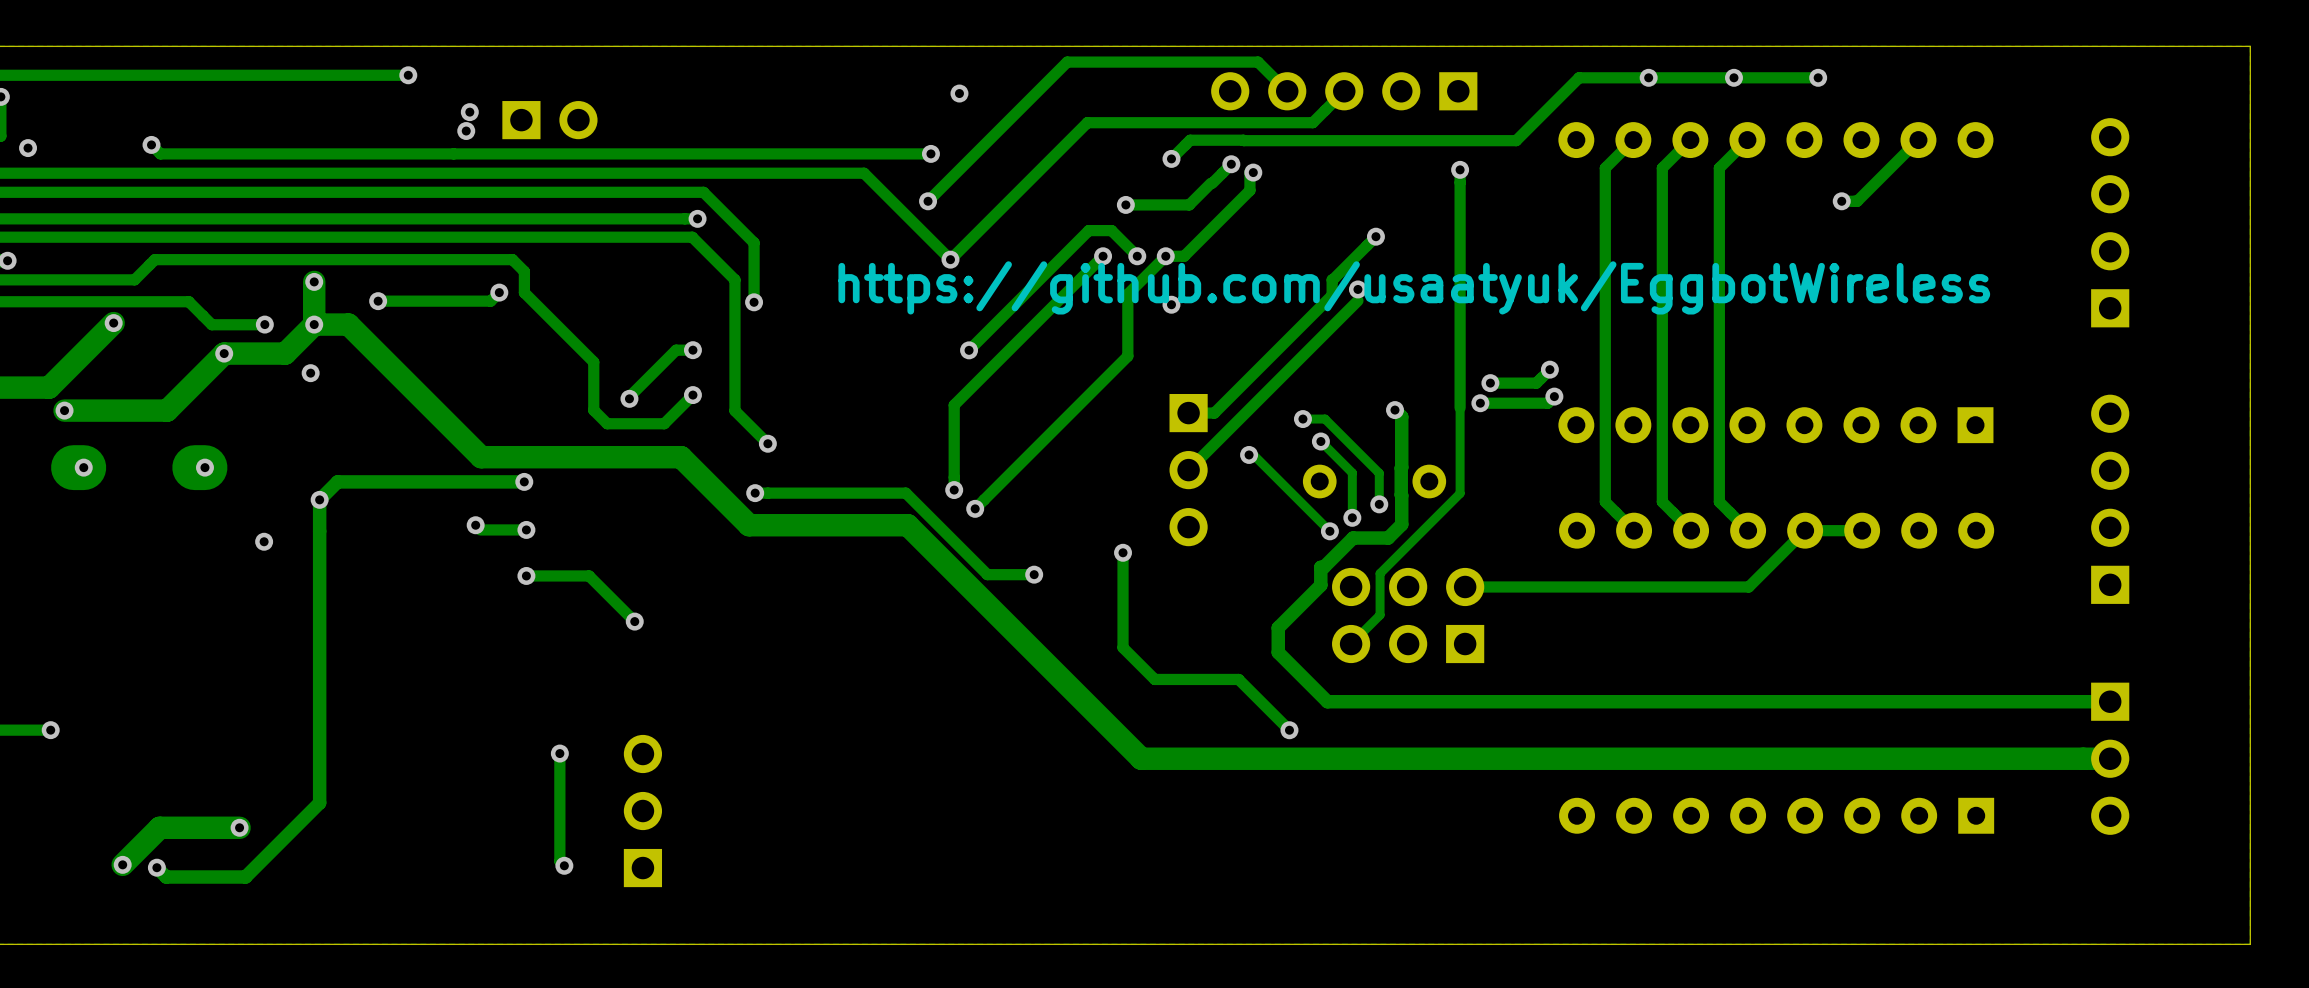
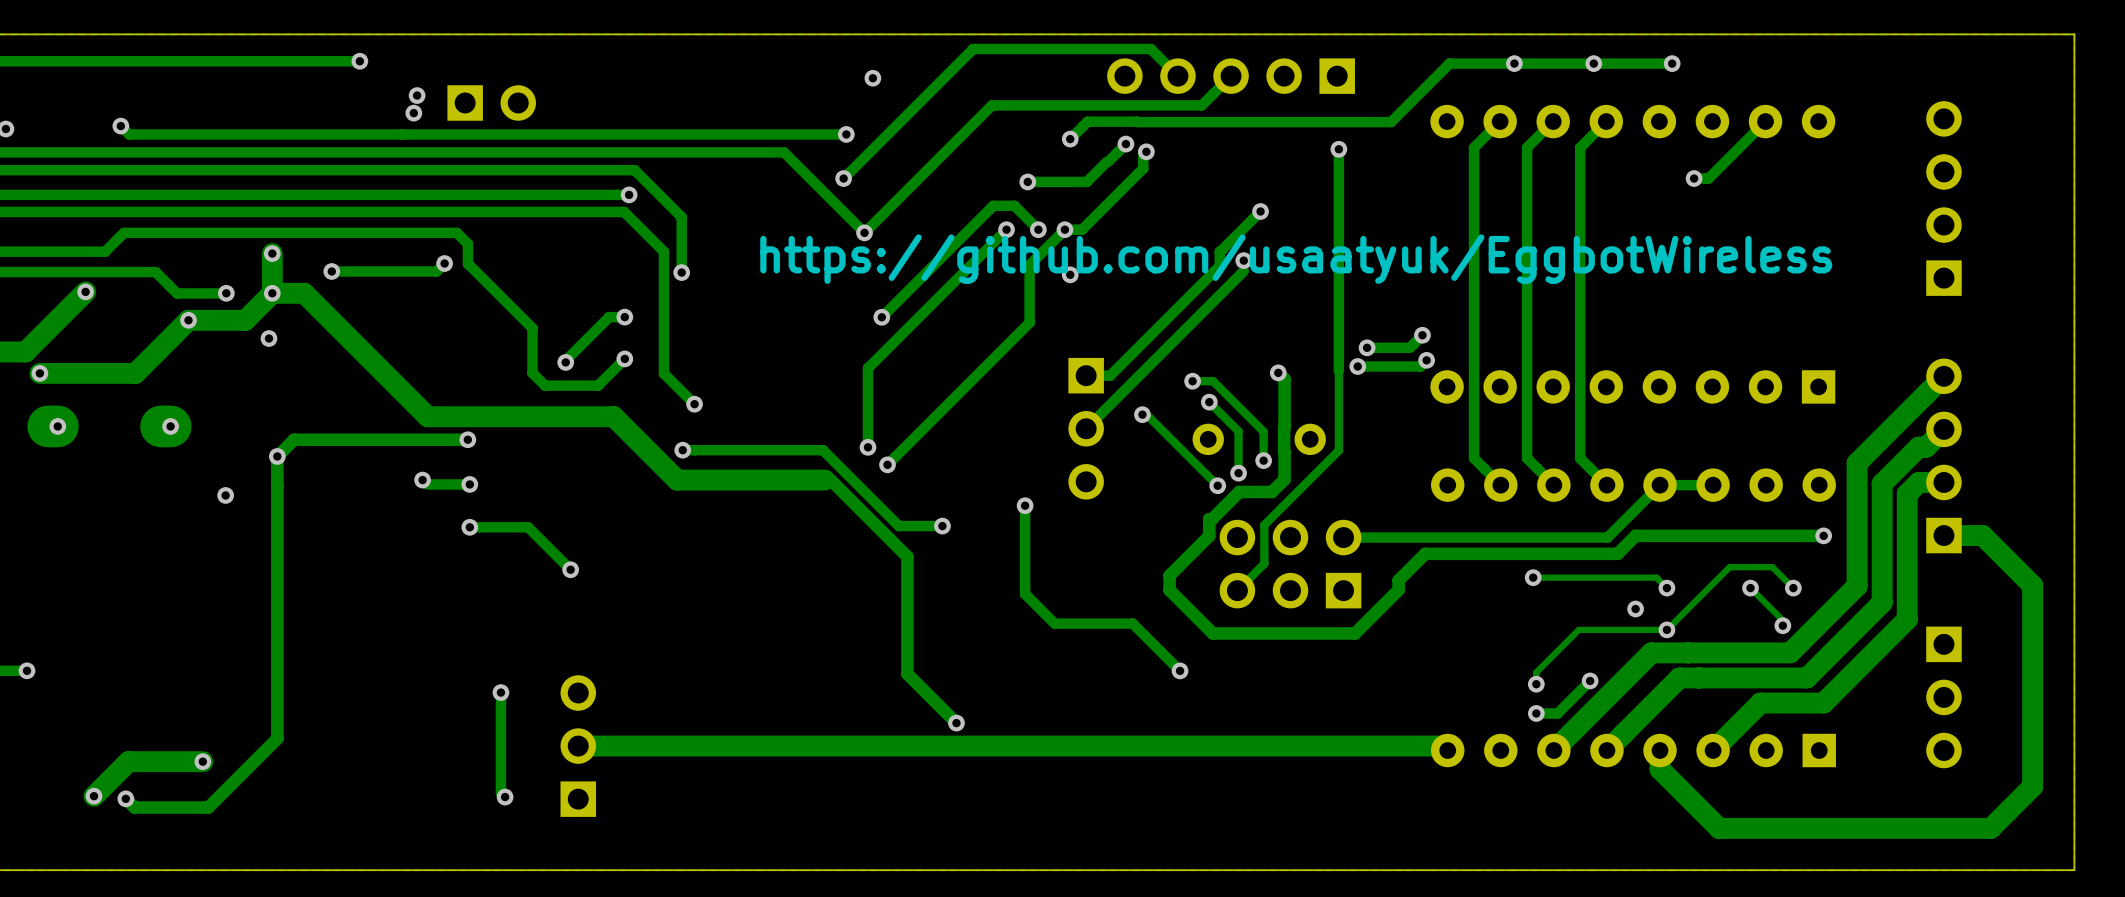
track: none -> (1943, 376) (1857, 463) (1857, 586) (1790, 652) (1651, 652) (1553, 750)
track: none -> (1943, 429) (1926, 447) (1918, 447) (1882, 483) (1882, 602) (1806, 677) (1679, 677) (1606, 750)
track: (907, 525) (1141, 758) (2110, 758) -> (824, 480) (830, 480) (907, 556) (907, 674) (956, 723)
track: none -> (1943, 482) (1918, 482) (1907, 494) (1907, 619) (1823, 703) (1760, 703) (1713, 750)
track: none -> (1943, 535) (1982, 535) (2032, 585) (2032, 786) (1990, 828) (1719, 828) (1660, 769) (1660, 750)
via: none -> (1823, 535)
track: none -> (1533, 577) (1656, 577) (1666, 588)
via: none -> (1533, 577)
via: none -> (1666, 588)
track: none -> (1750, 588) (1782, 620) (1782, 625)
via: none -> (1750, 588)
track: none -> (1793, 588) (1772, 567) (1729, 567) (1666, 629) (1578, 629) (1536, 672) (1536, 684)
via: none -> (1793, 588)
track: (1278, 643) (1278, 652) (1327, 701) (2110, 701) -> (1169, 590) (1212, 633) (1355, 633) (1398, 589) (1398, 580) (1425, 553) (1617, 553) (1635, 535) (1823, 535)
via: none -> (1635, 609)
via: none -> (1782, 625)
via: none -> (1666, 629)
track: none -> (1590, 680) (1557, 713) (1536, 713)
via: none -> (1590, 680)
via: none -> (1536, 684)
via: none -> (1536, 713)
via: none -> (956, 723)
track: none -> (578, 746) (1443, 746) (1447, 750)

